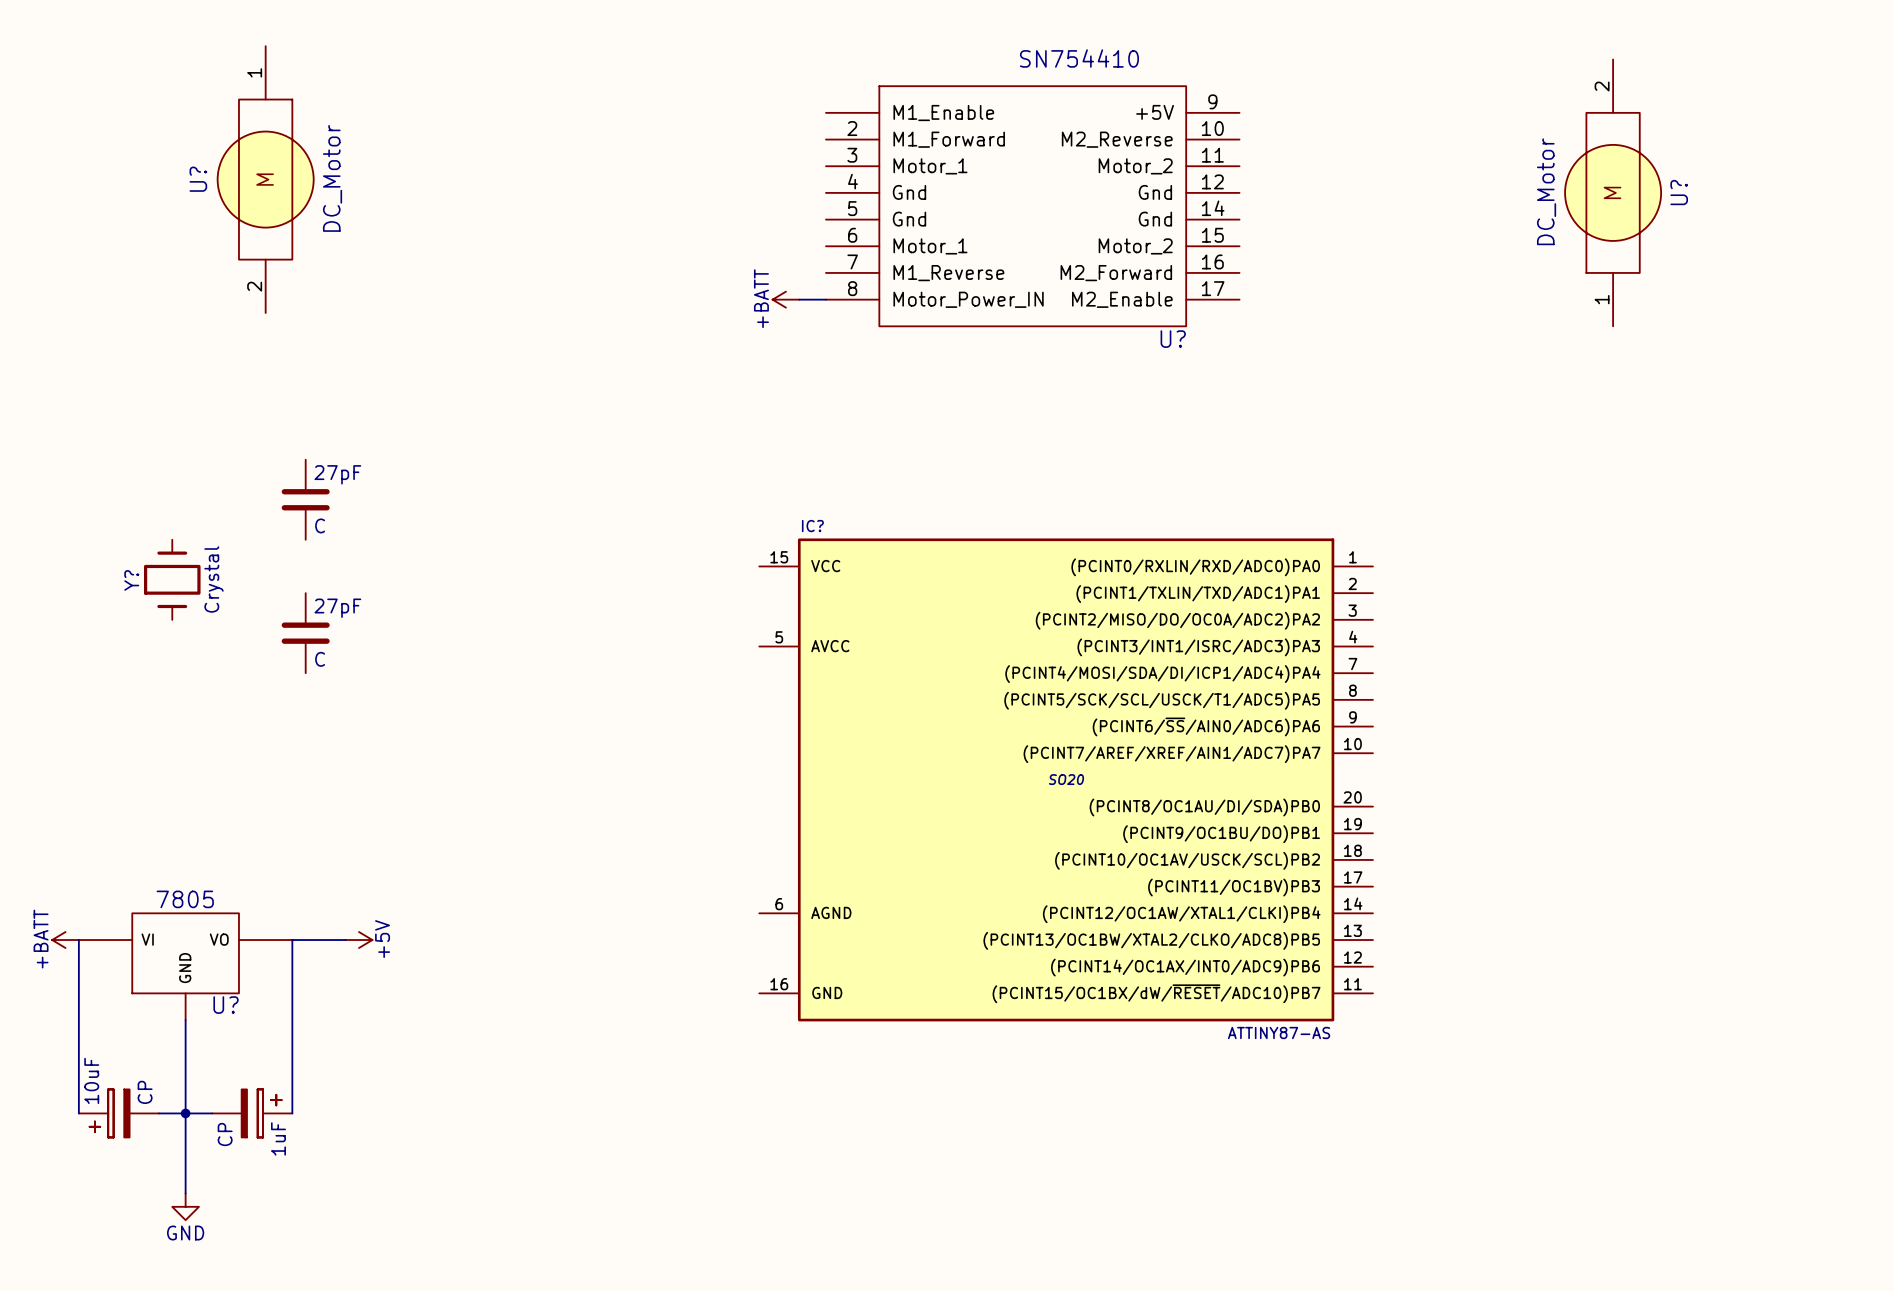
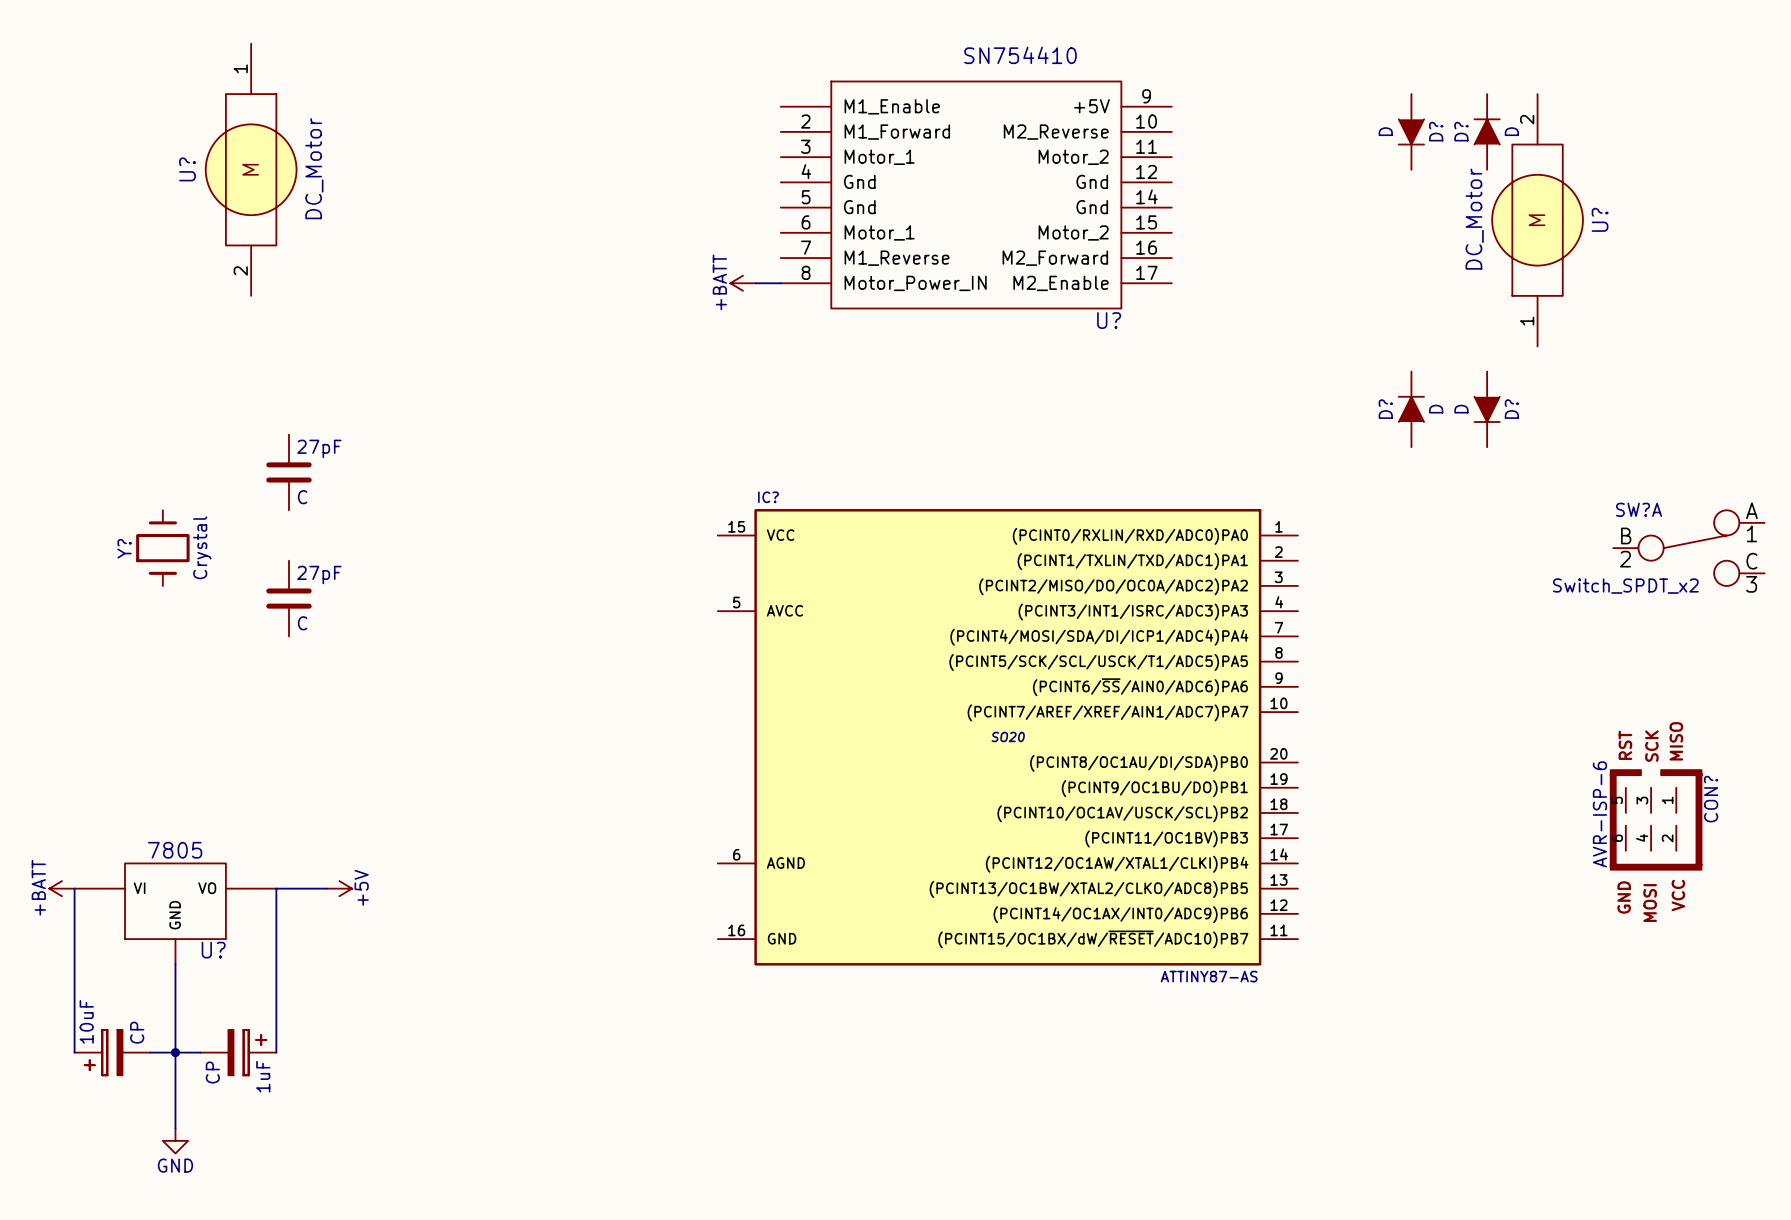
D?: none -> D (1411, 131)
D?: none -> D (1487, 131)
U? position: (1613, 192) -> (1537, 220)
D?: none -> D (1411, 409)
D?: none -> D (1487, 409)
SW?A: none -> Switch_SPDT_x2 (1688, 548)
CON?: none -> AVR-ISP-6 (1656, 819)

